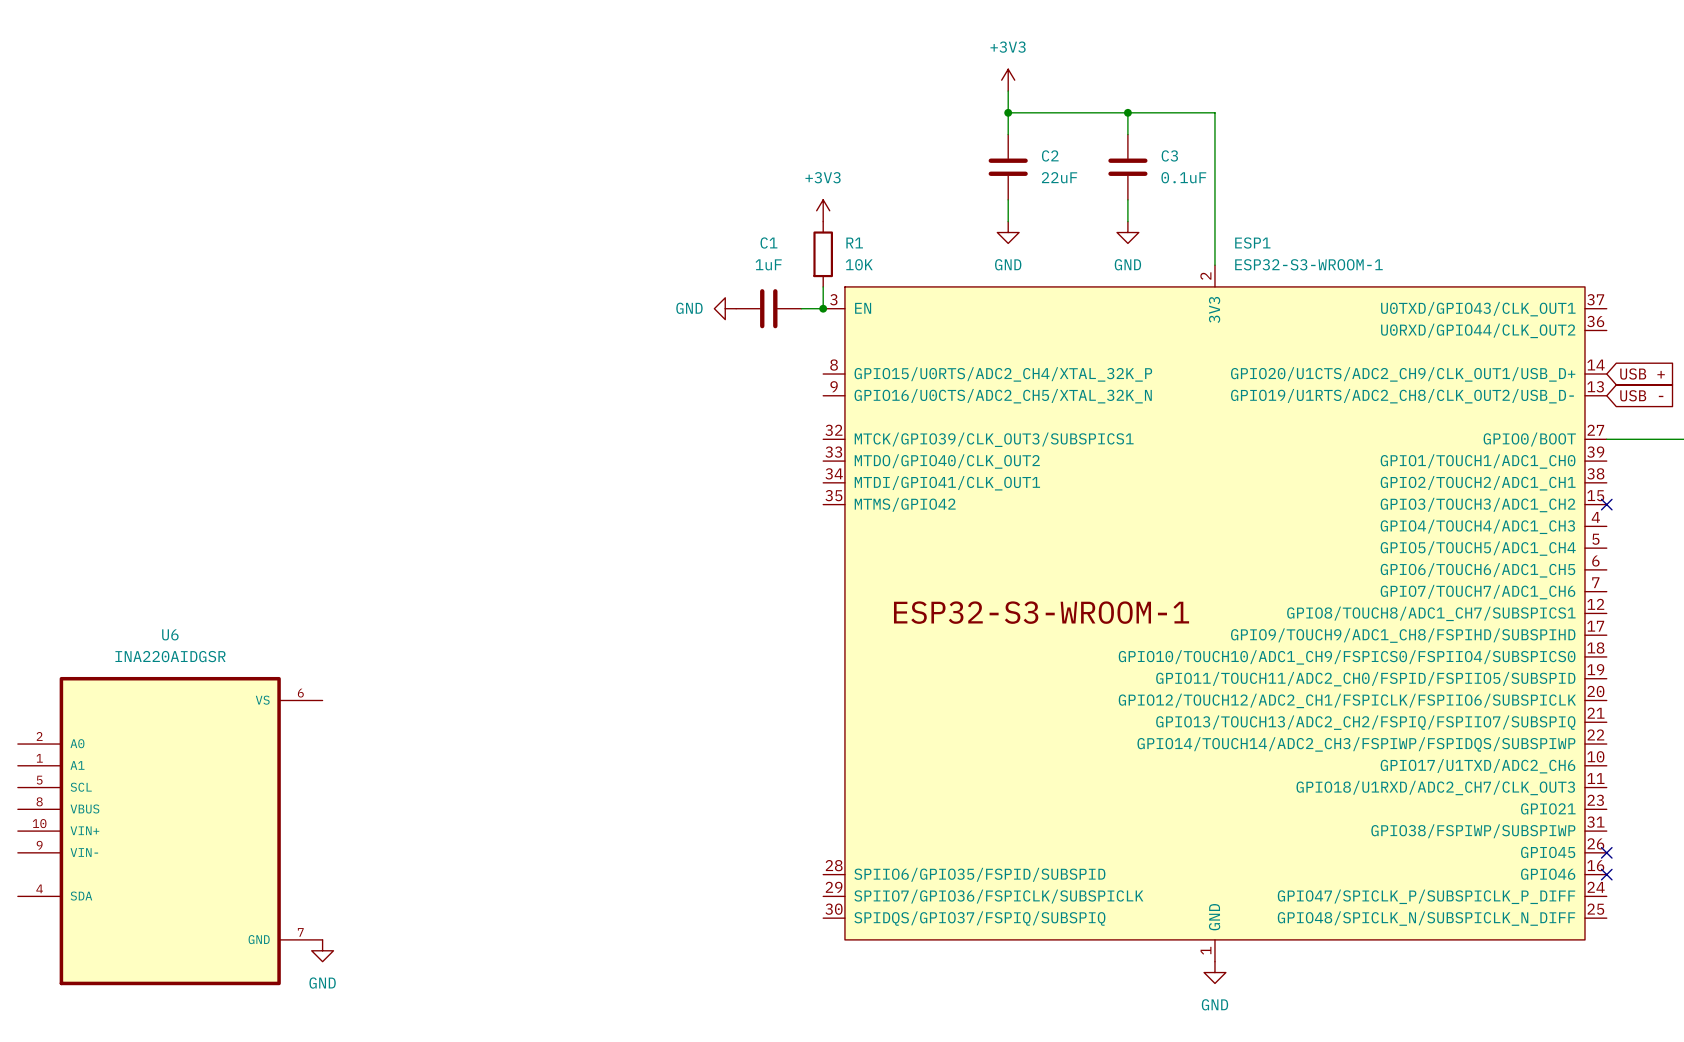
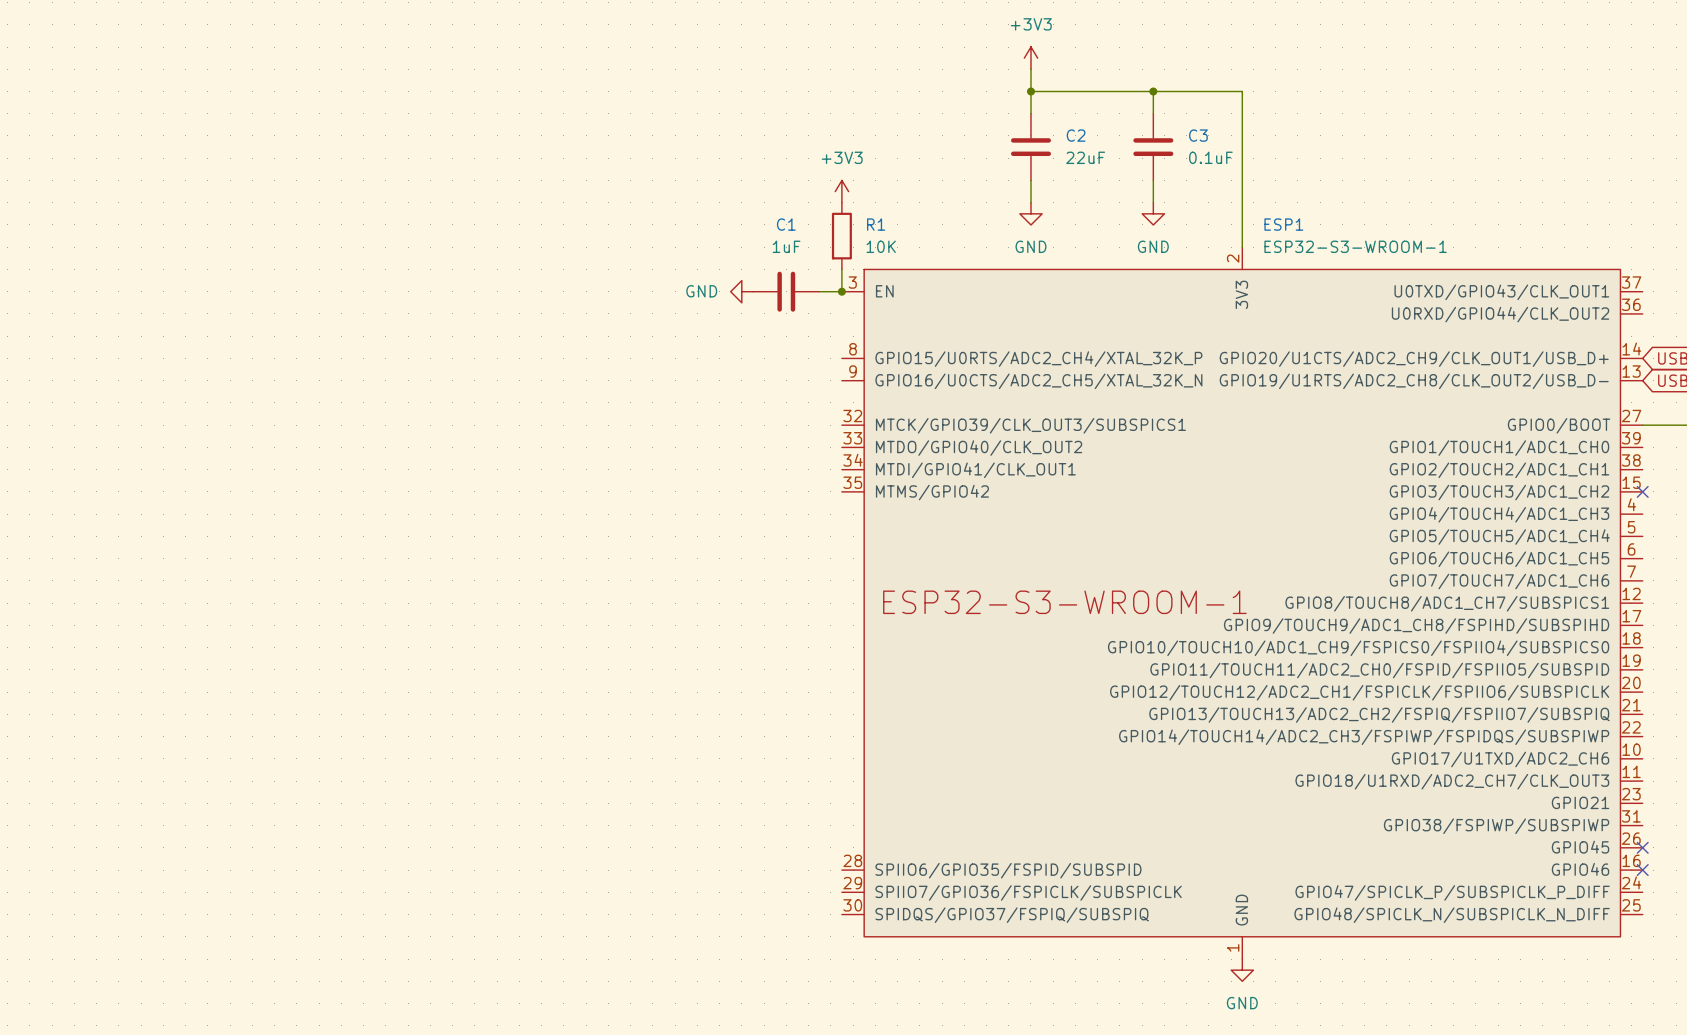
U6: INA220AIDGSR (170, 831) -> none
power symbol: GND (322, 950) -> none

